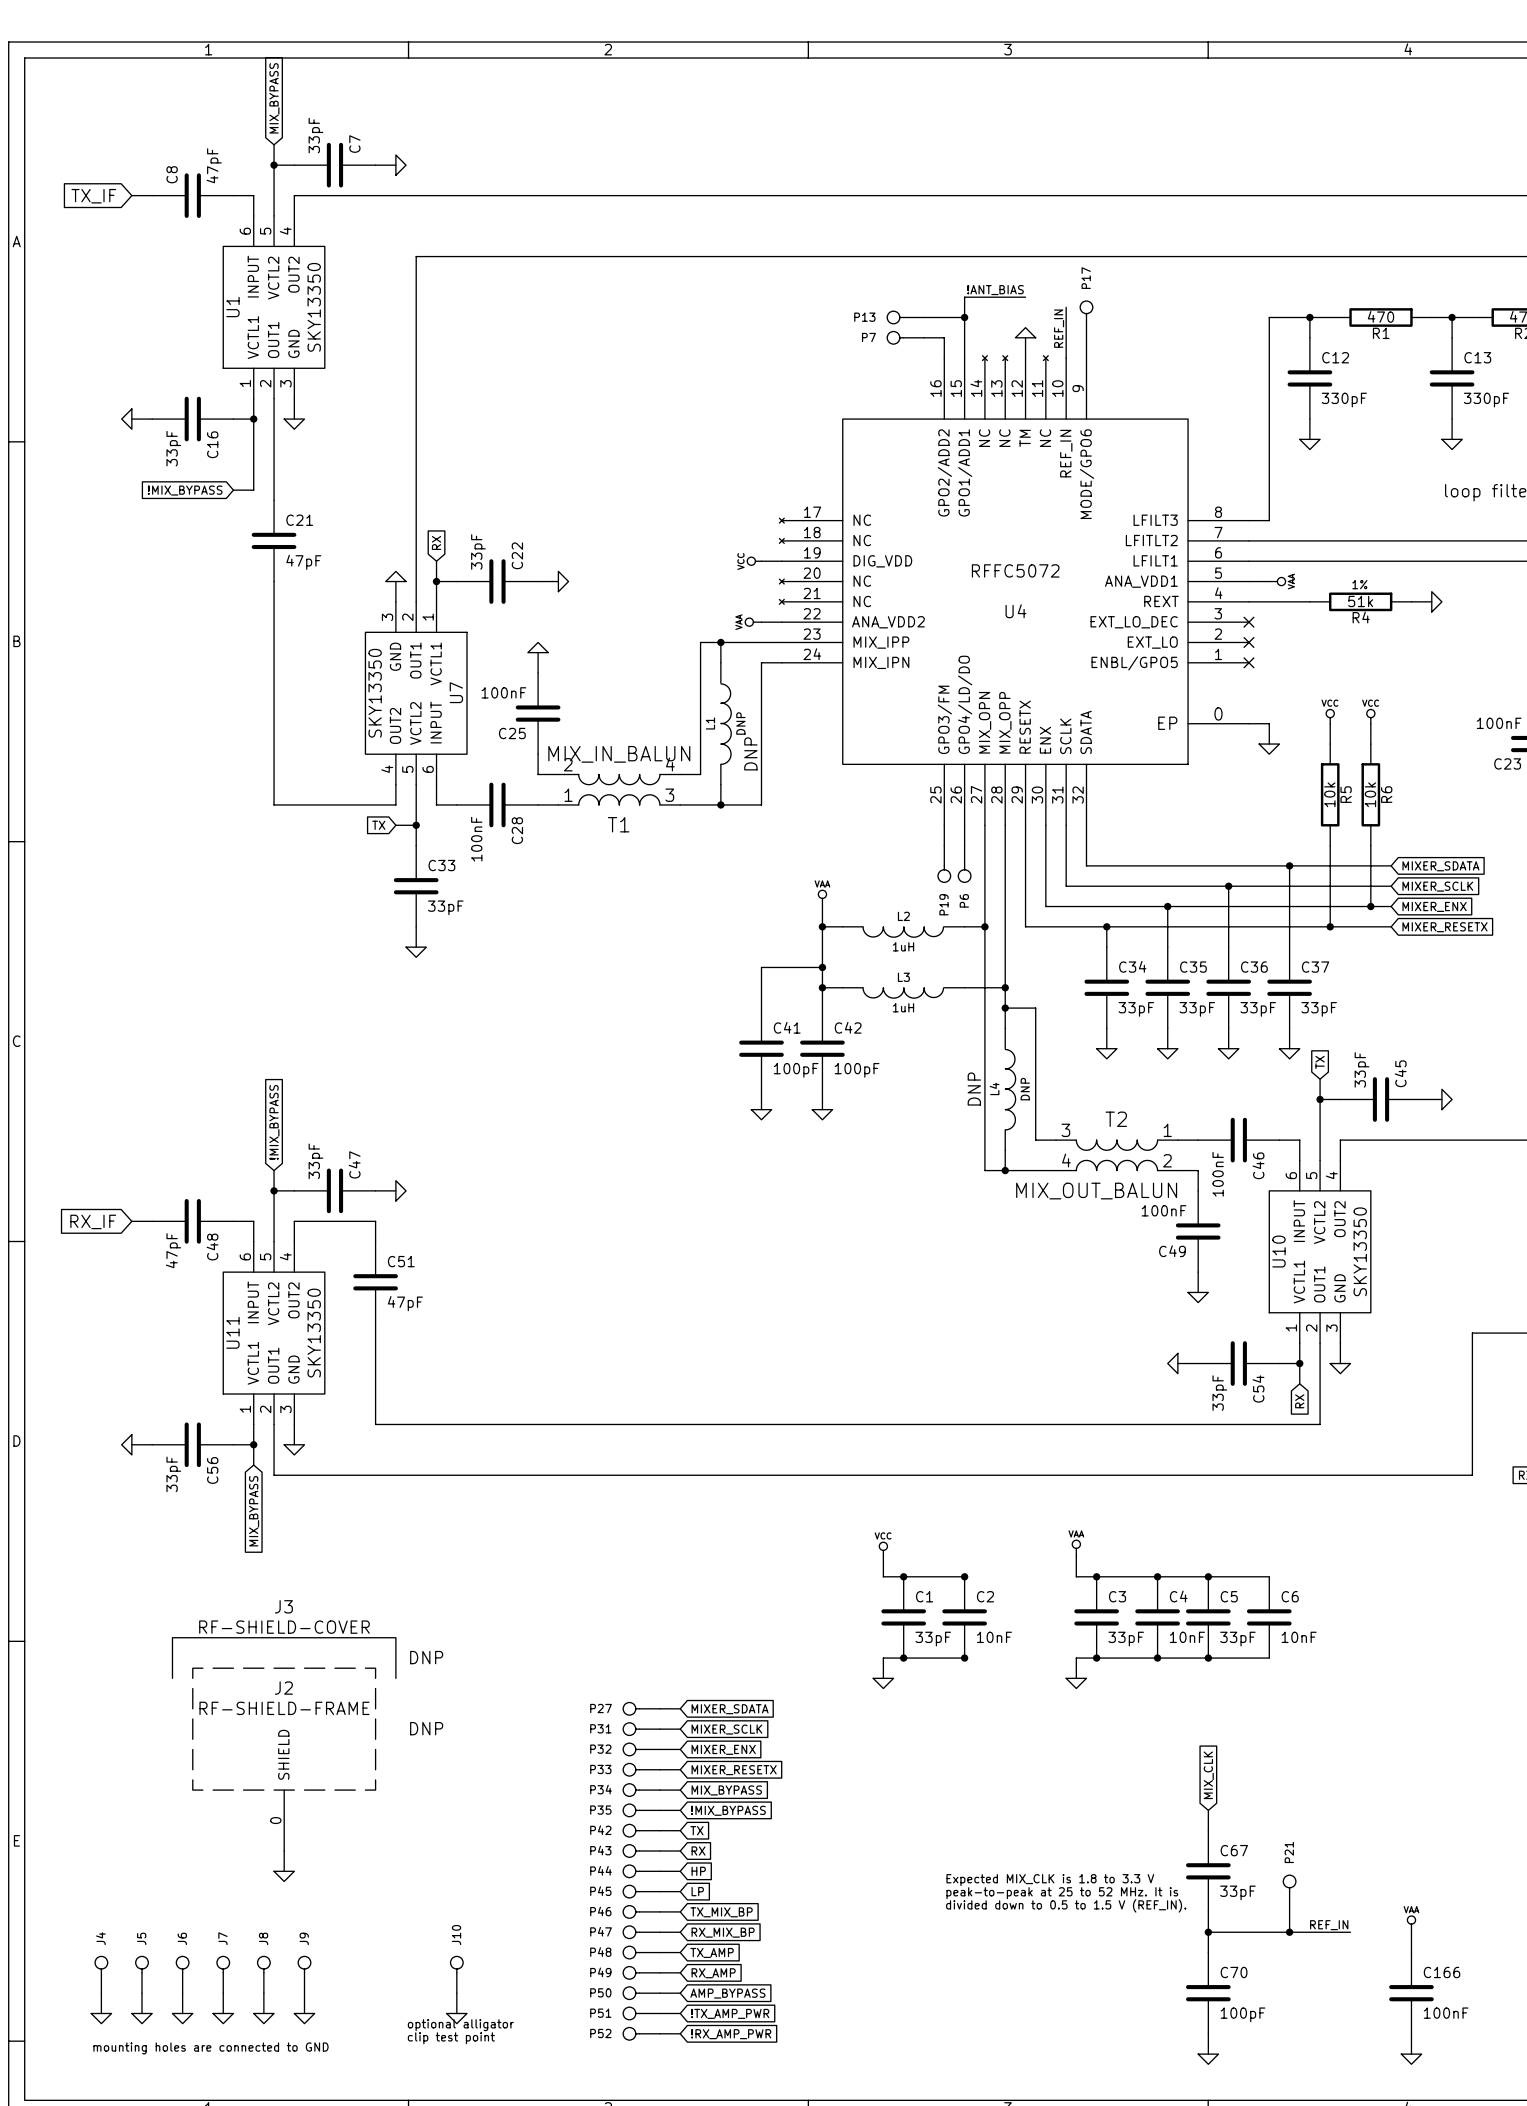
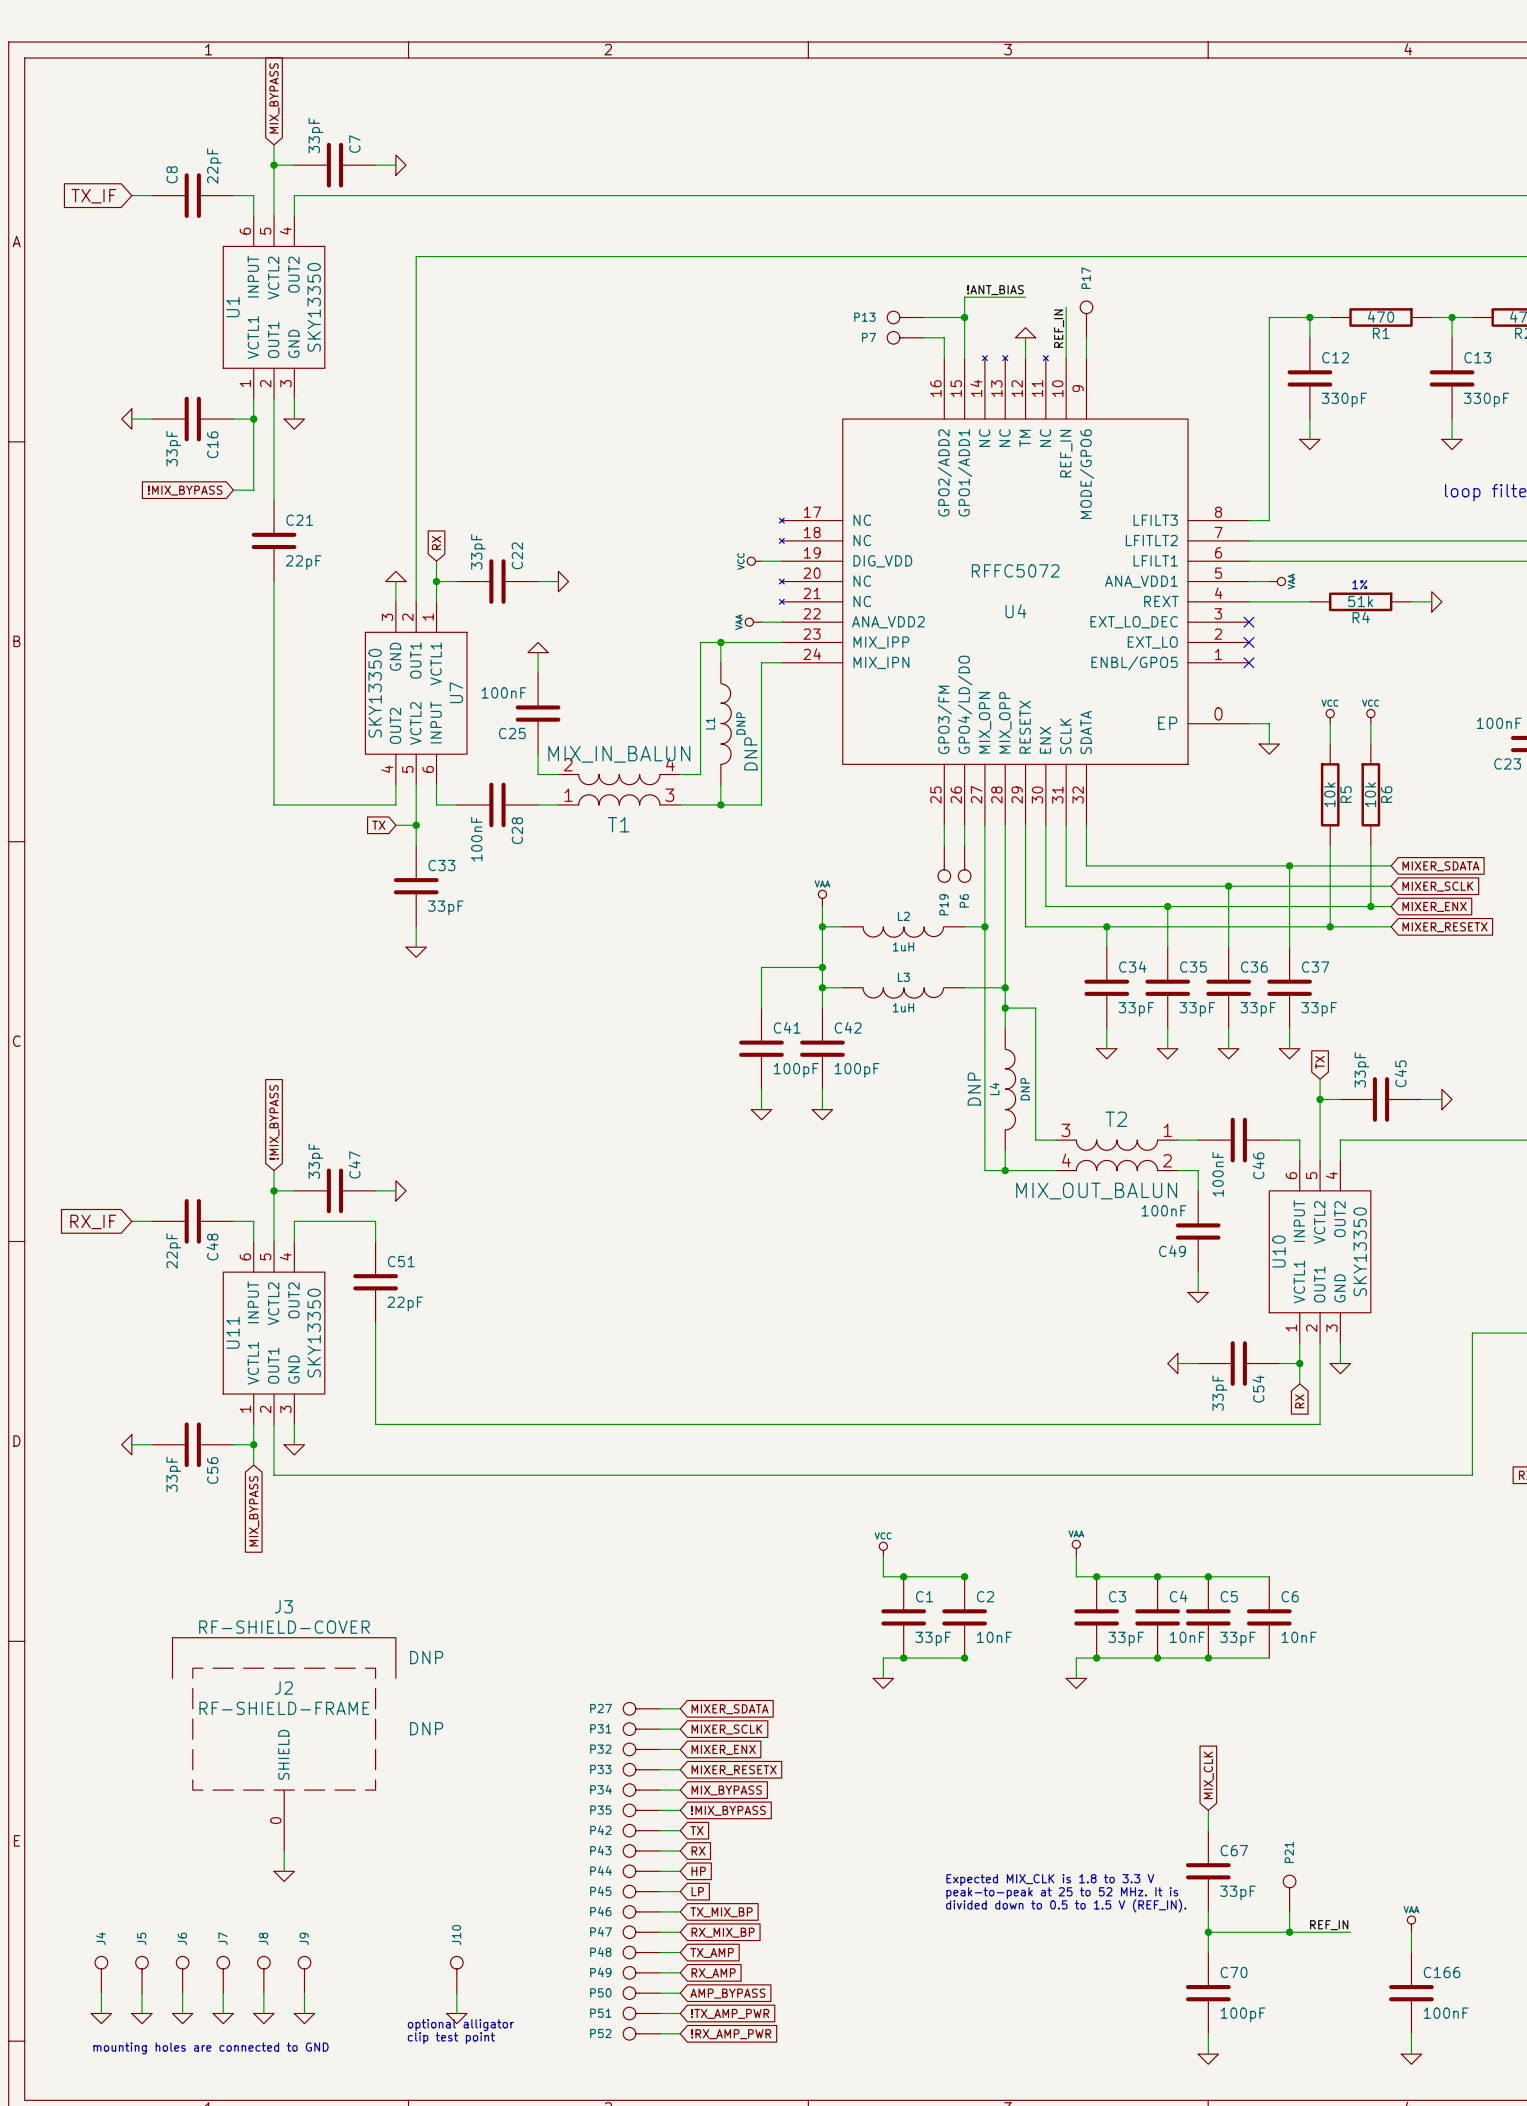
C8 value: 47pF (214, 165) -> 22pF (214, 166)
C21 value: 47pF (303, 562) -> 22pF (303, 562)
C48 value: 47pF (173, 1250) -> 22pF (173, 1250)
C51 value: 47pF (405, 1303) -> 22pF (405, 1303)

